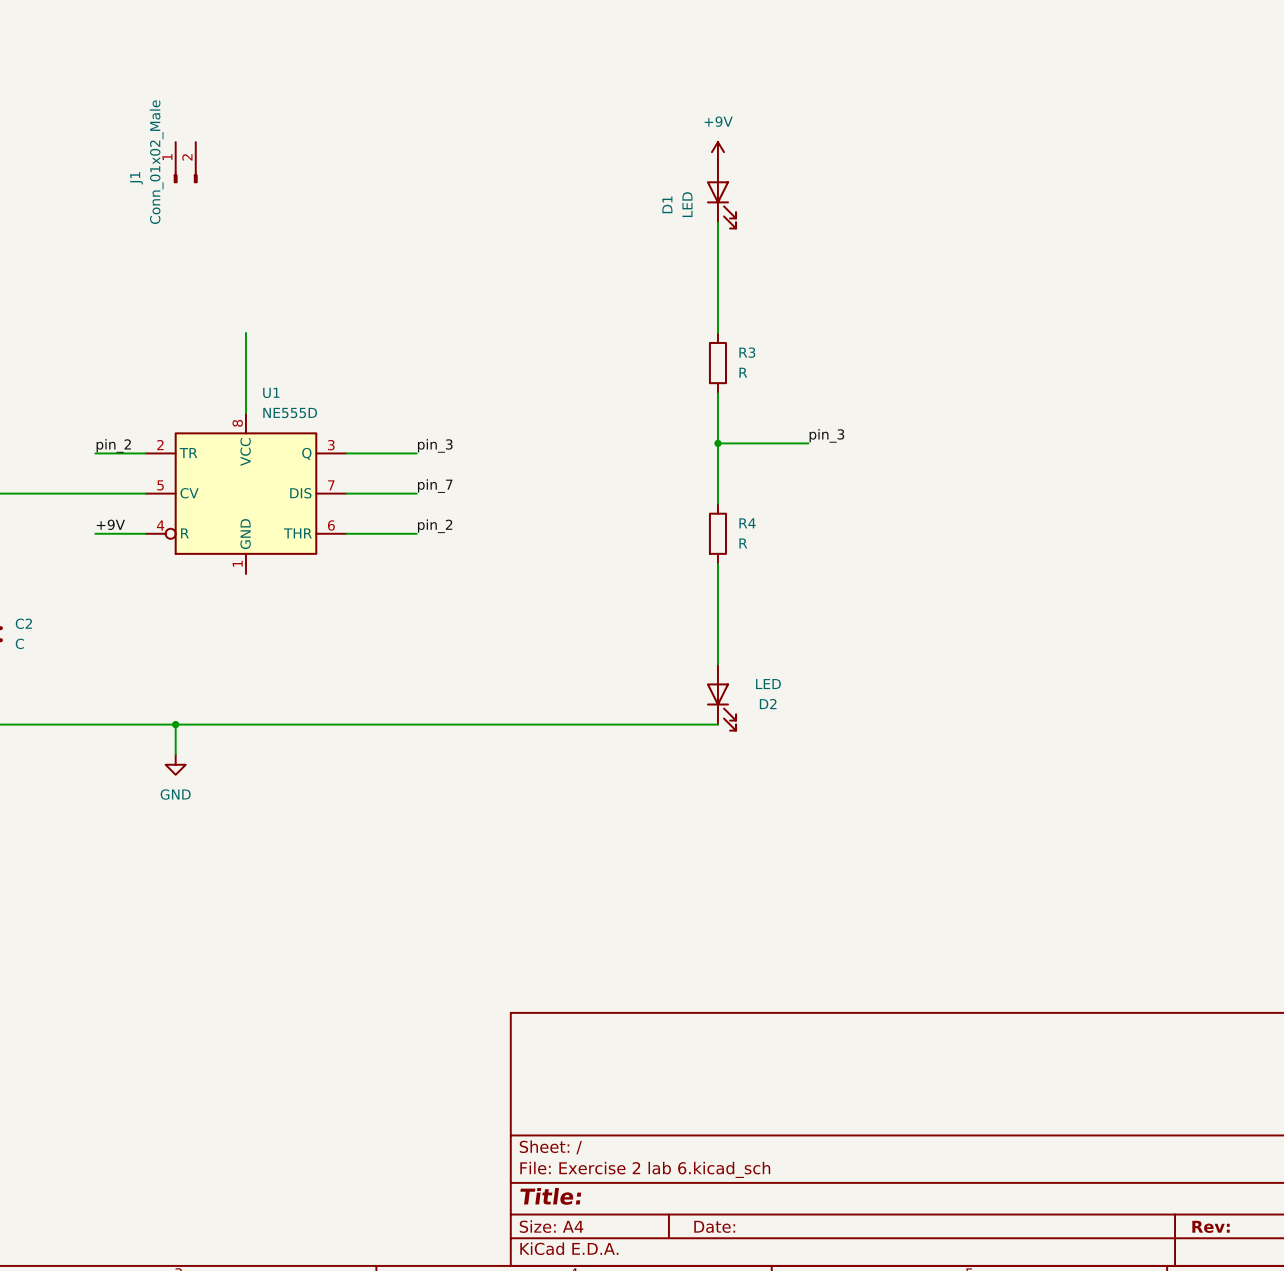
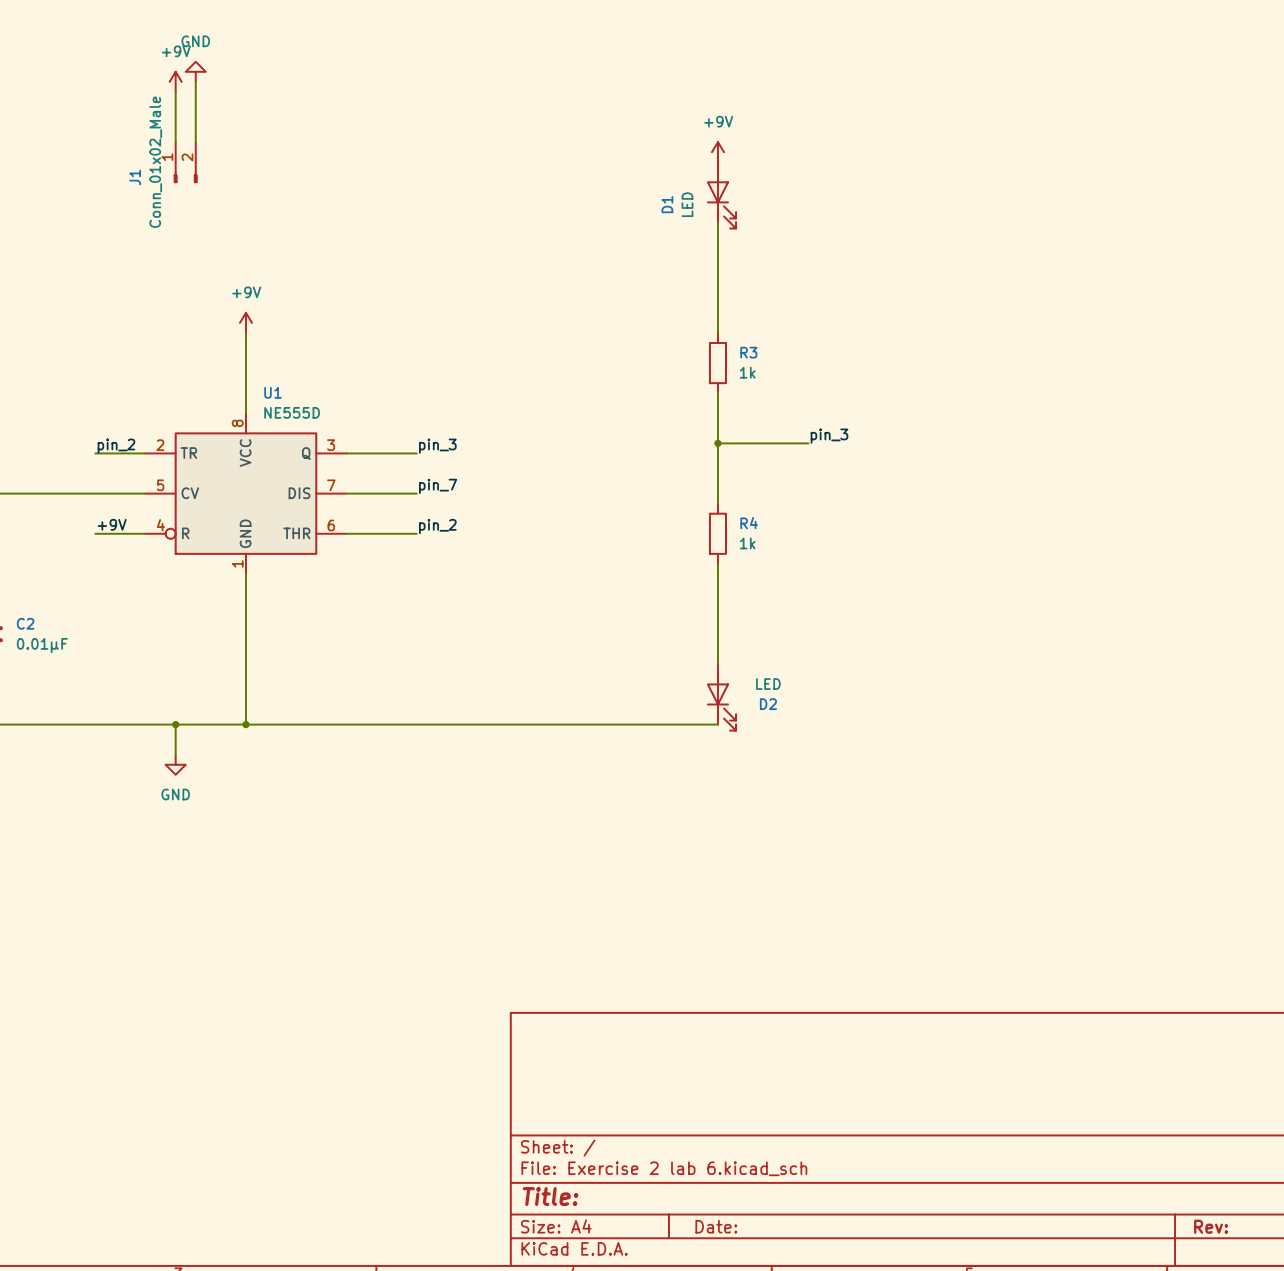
power symbol: none -> GND (195, 71)
power symbol: none -> +9V (175, 81)
wire: none -> (195, 81) (195, 142)
wire: none -> (175, 91) (175, 142)
power symbol: none -> +9V (245, 322)
R3 value: R (743, 372) -> 1k (747, 372)
R4 value: R (743, 543) -> 1k (747, 543)
wire: none -> (245, 573) (245, 724)
C2 value: C (19, 643) -> 0.01μF (42, 645)
junction: none -> (245, 724)

